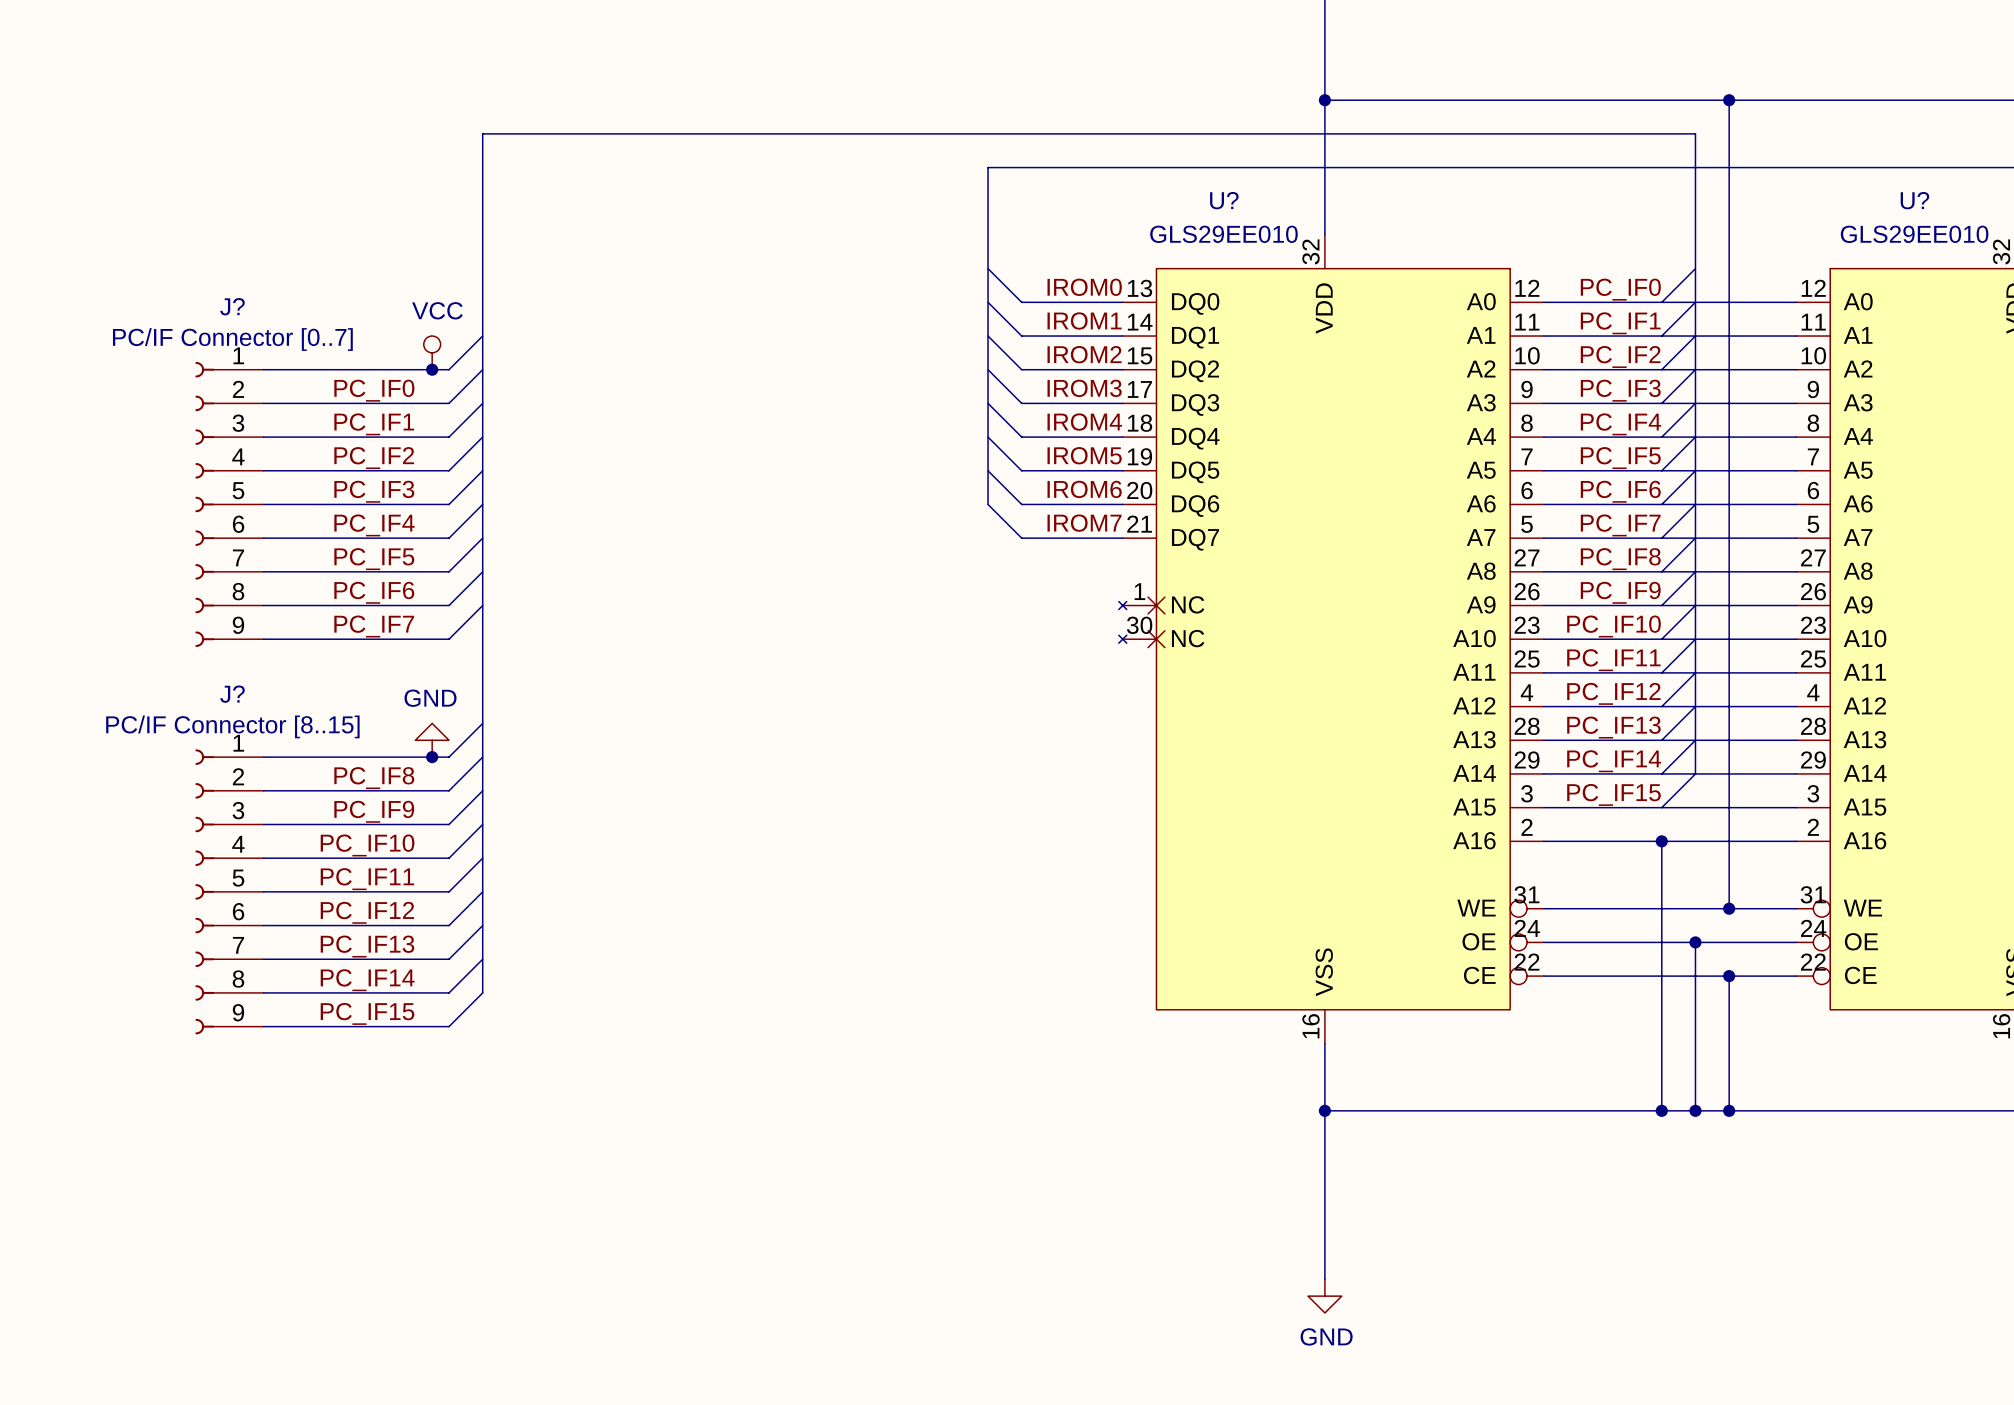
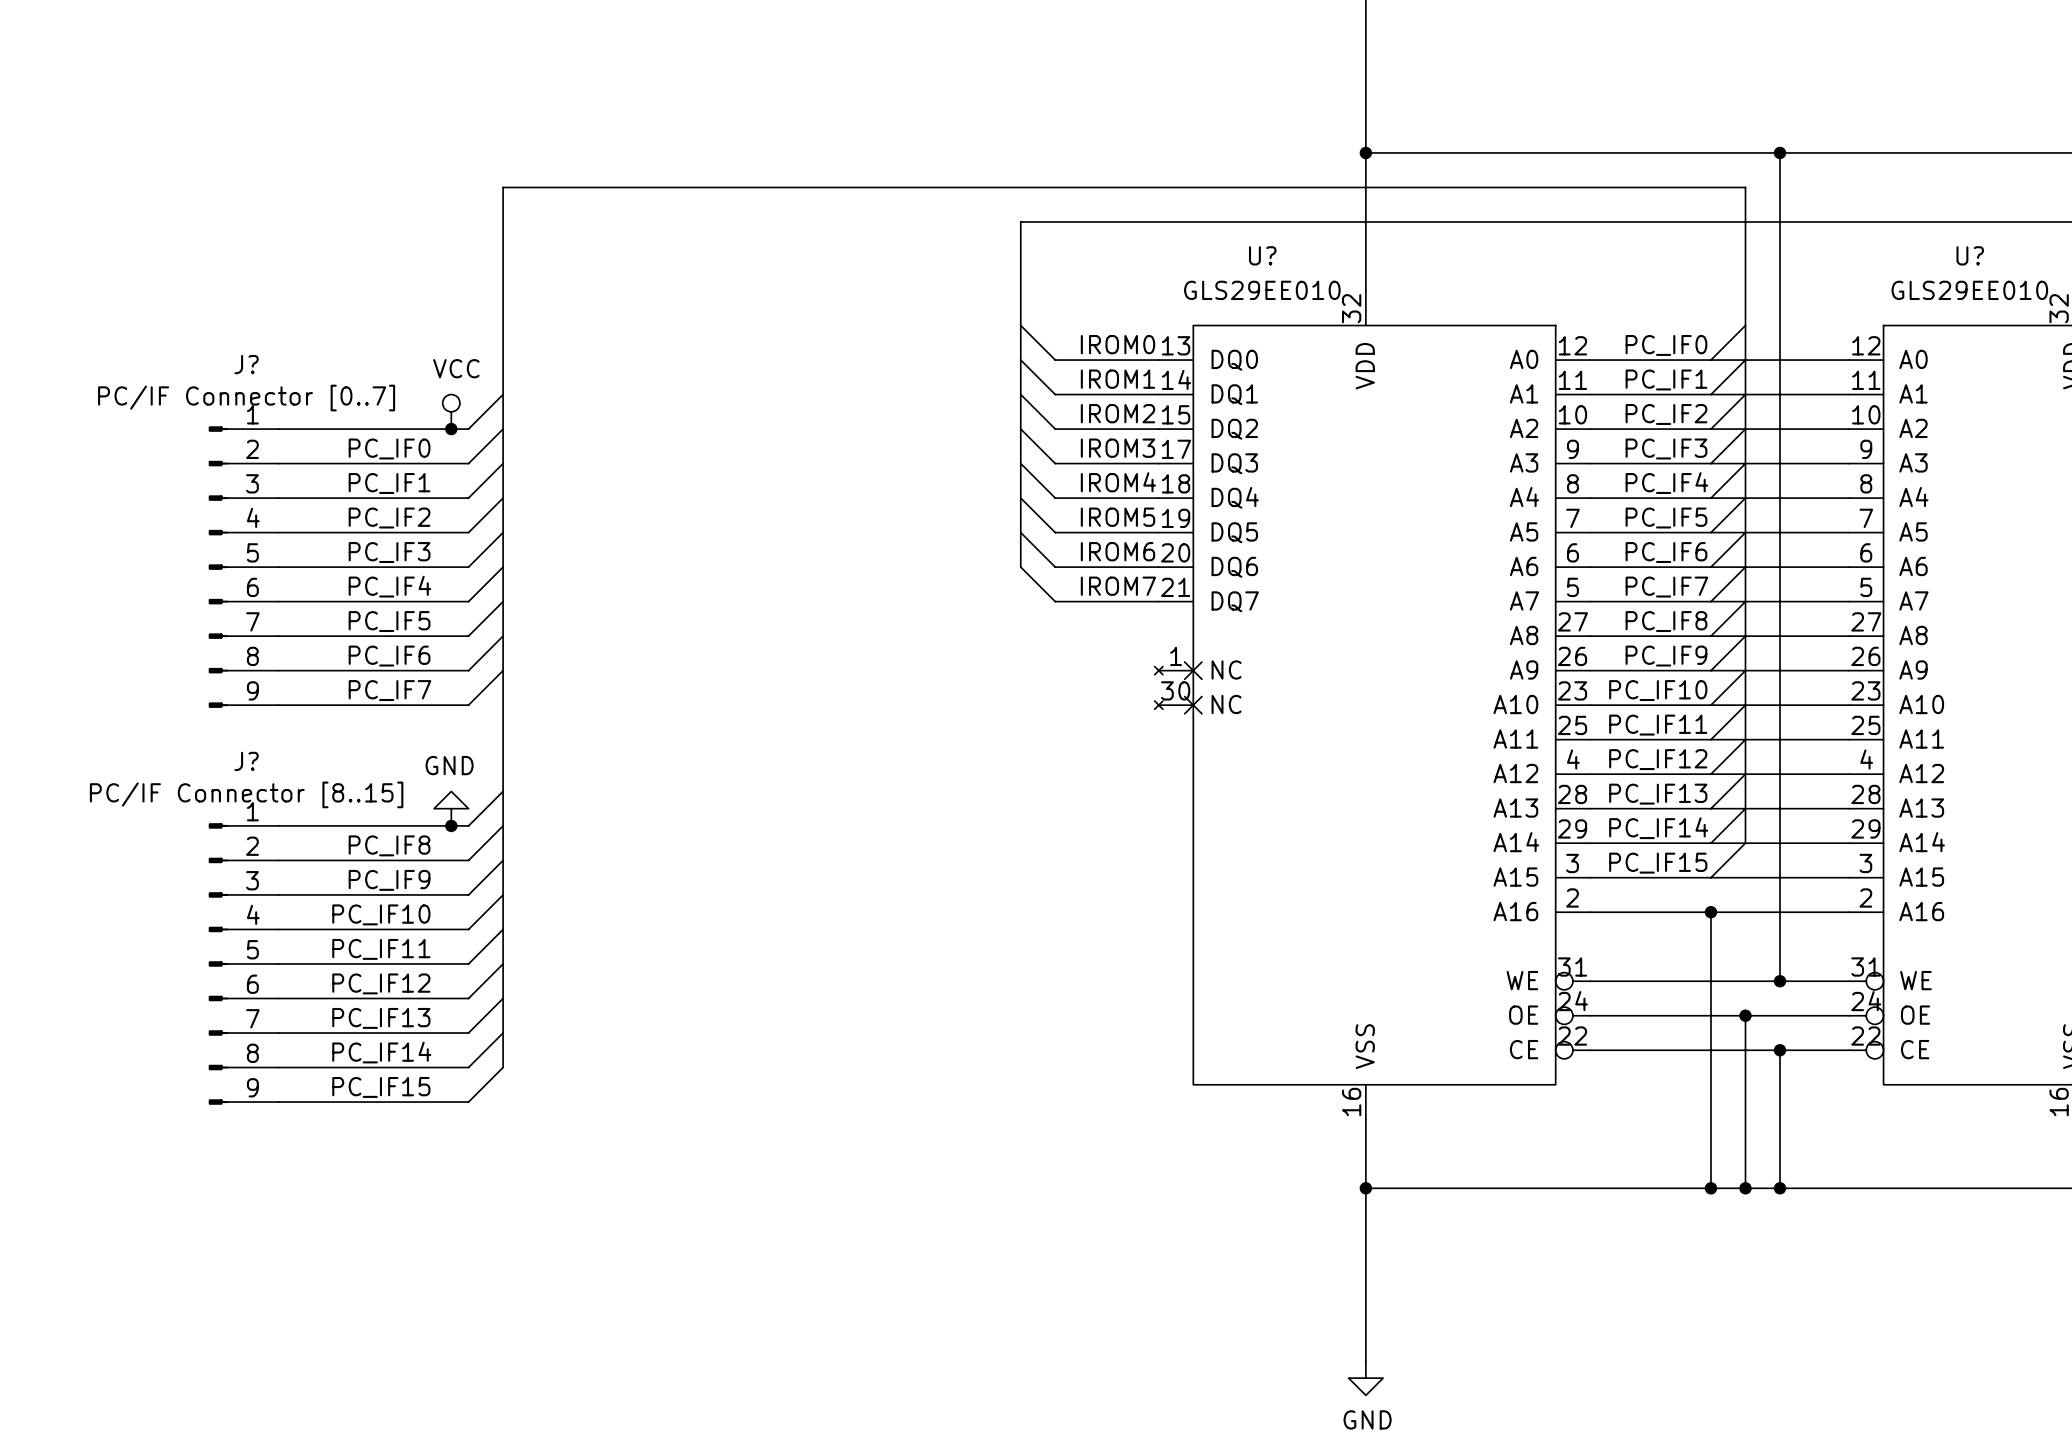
J? symbol: [195, 361, 264, 647] -> [208, 426, 279, 708]
J? symbol: [195, 749, 264, 1035] -> [208, 823, 279, 1105]

